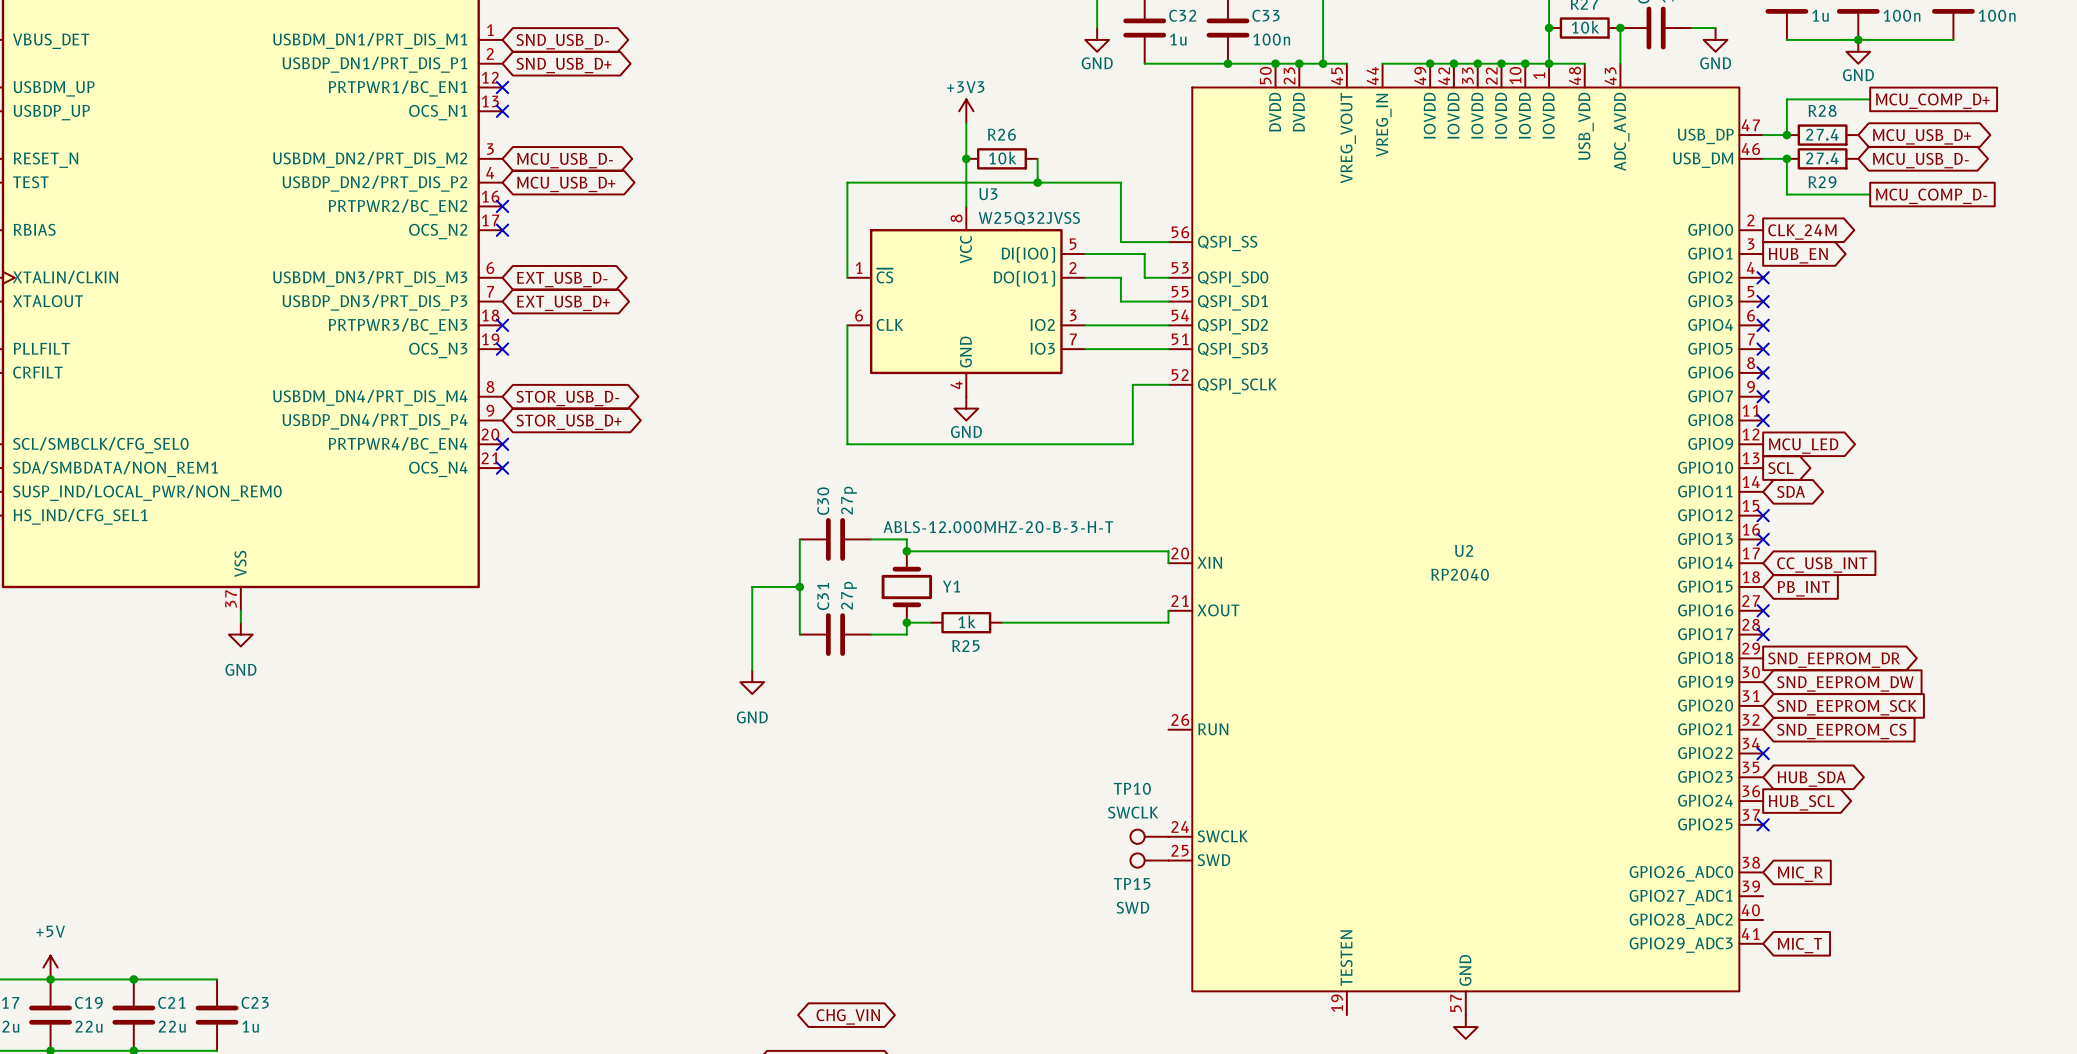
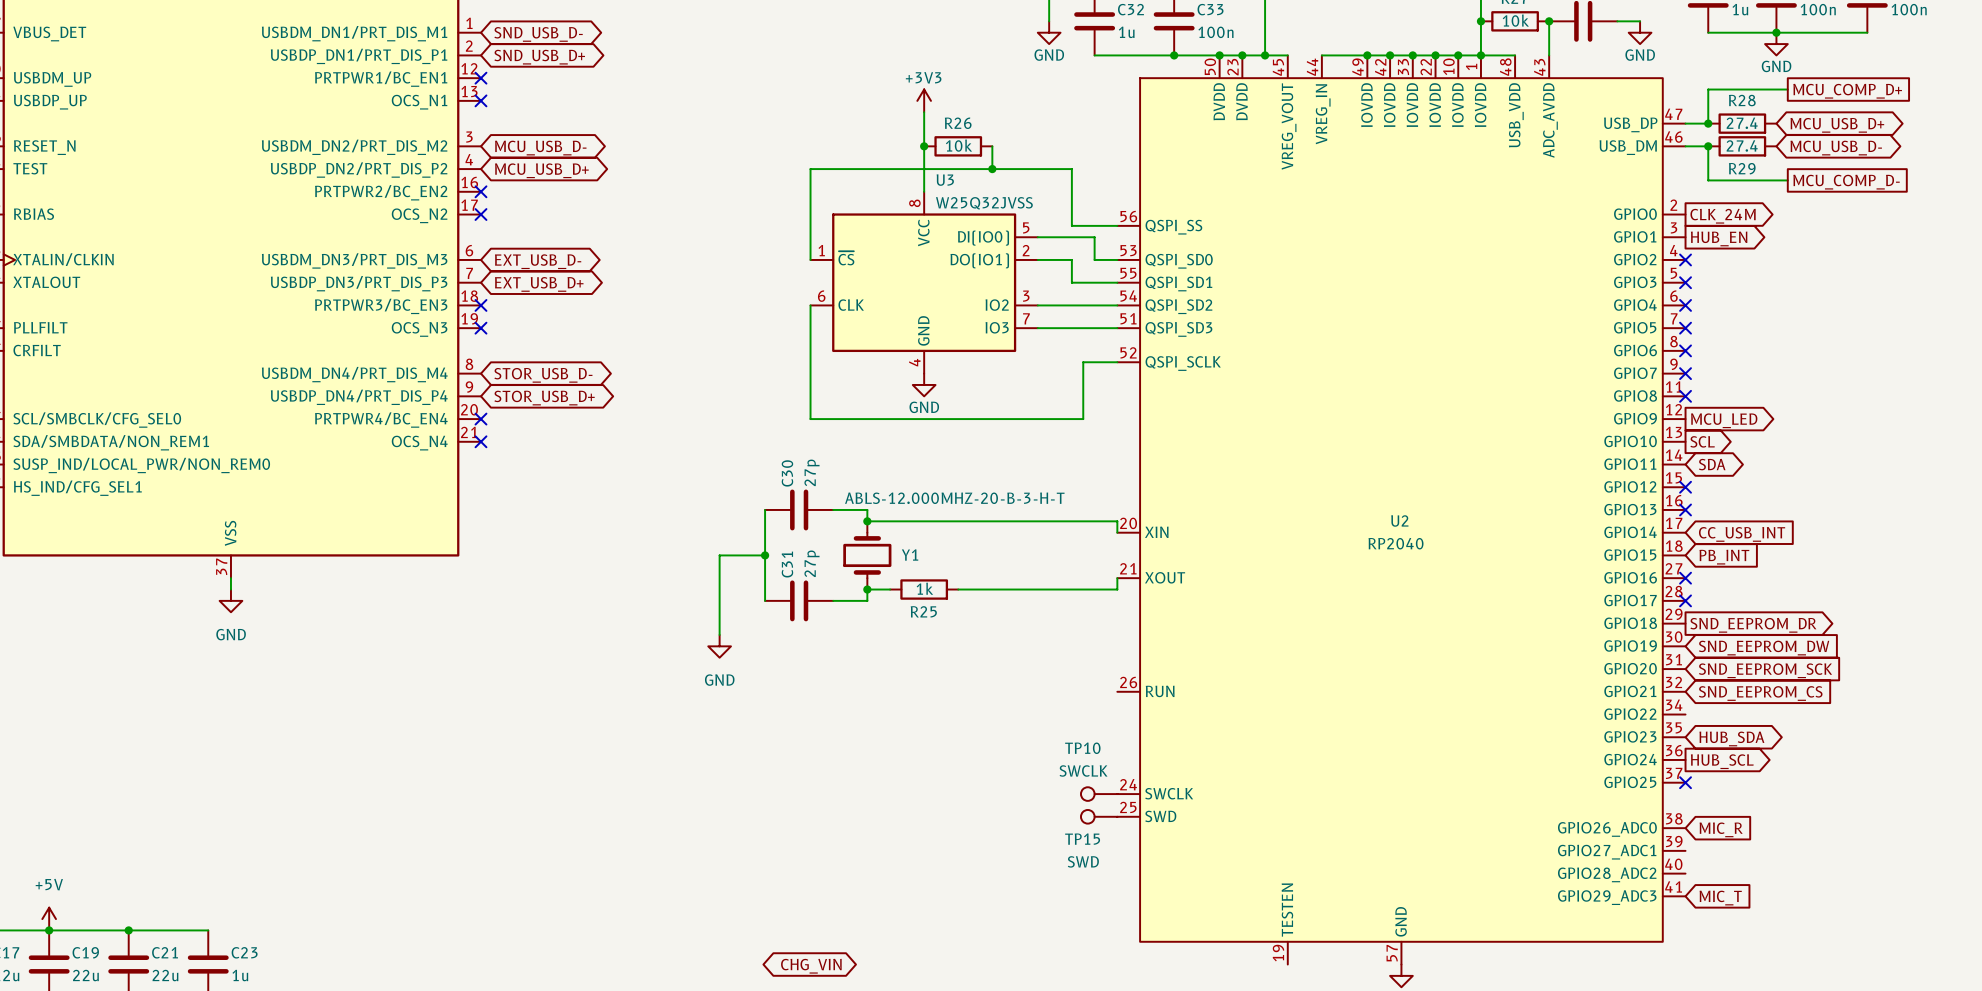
no-connect mark: (1763, 753) -> none

